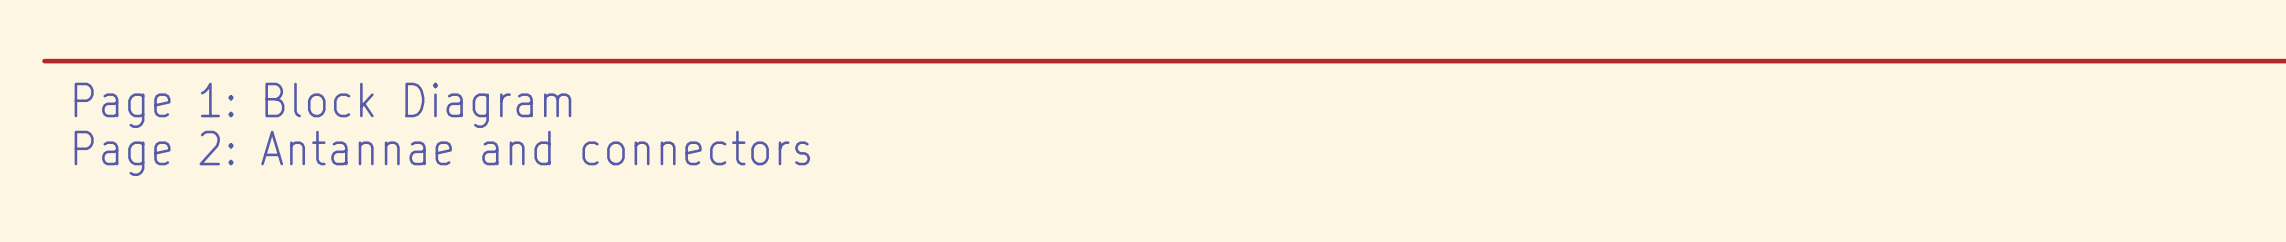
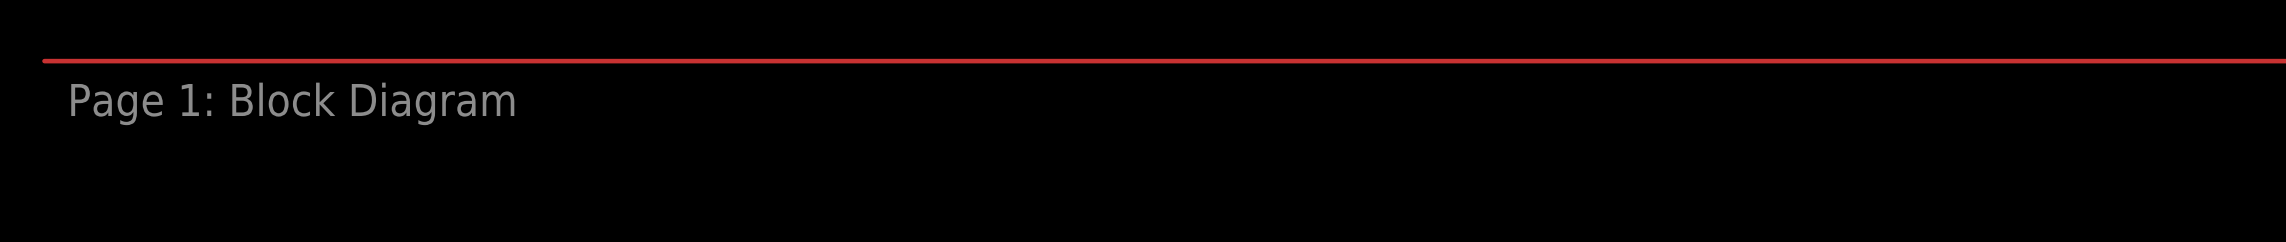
text: Page 2: Antannae and connectors (442, 153) -> none

